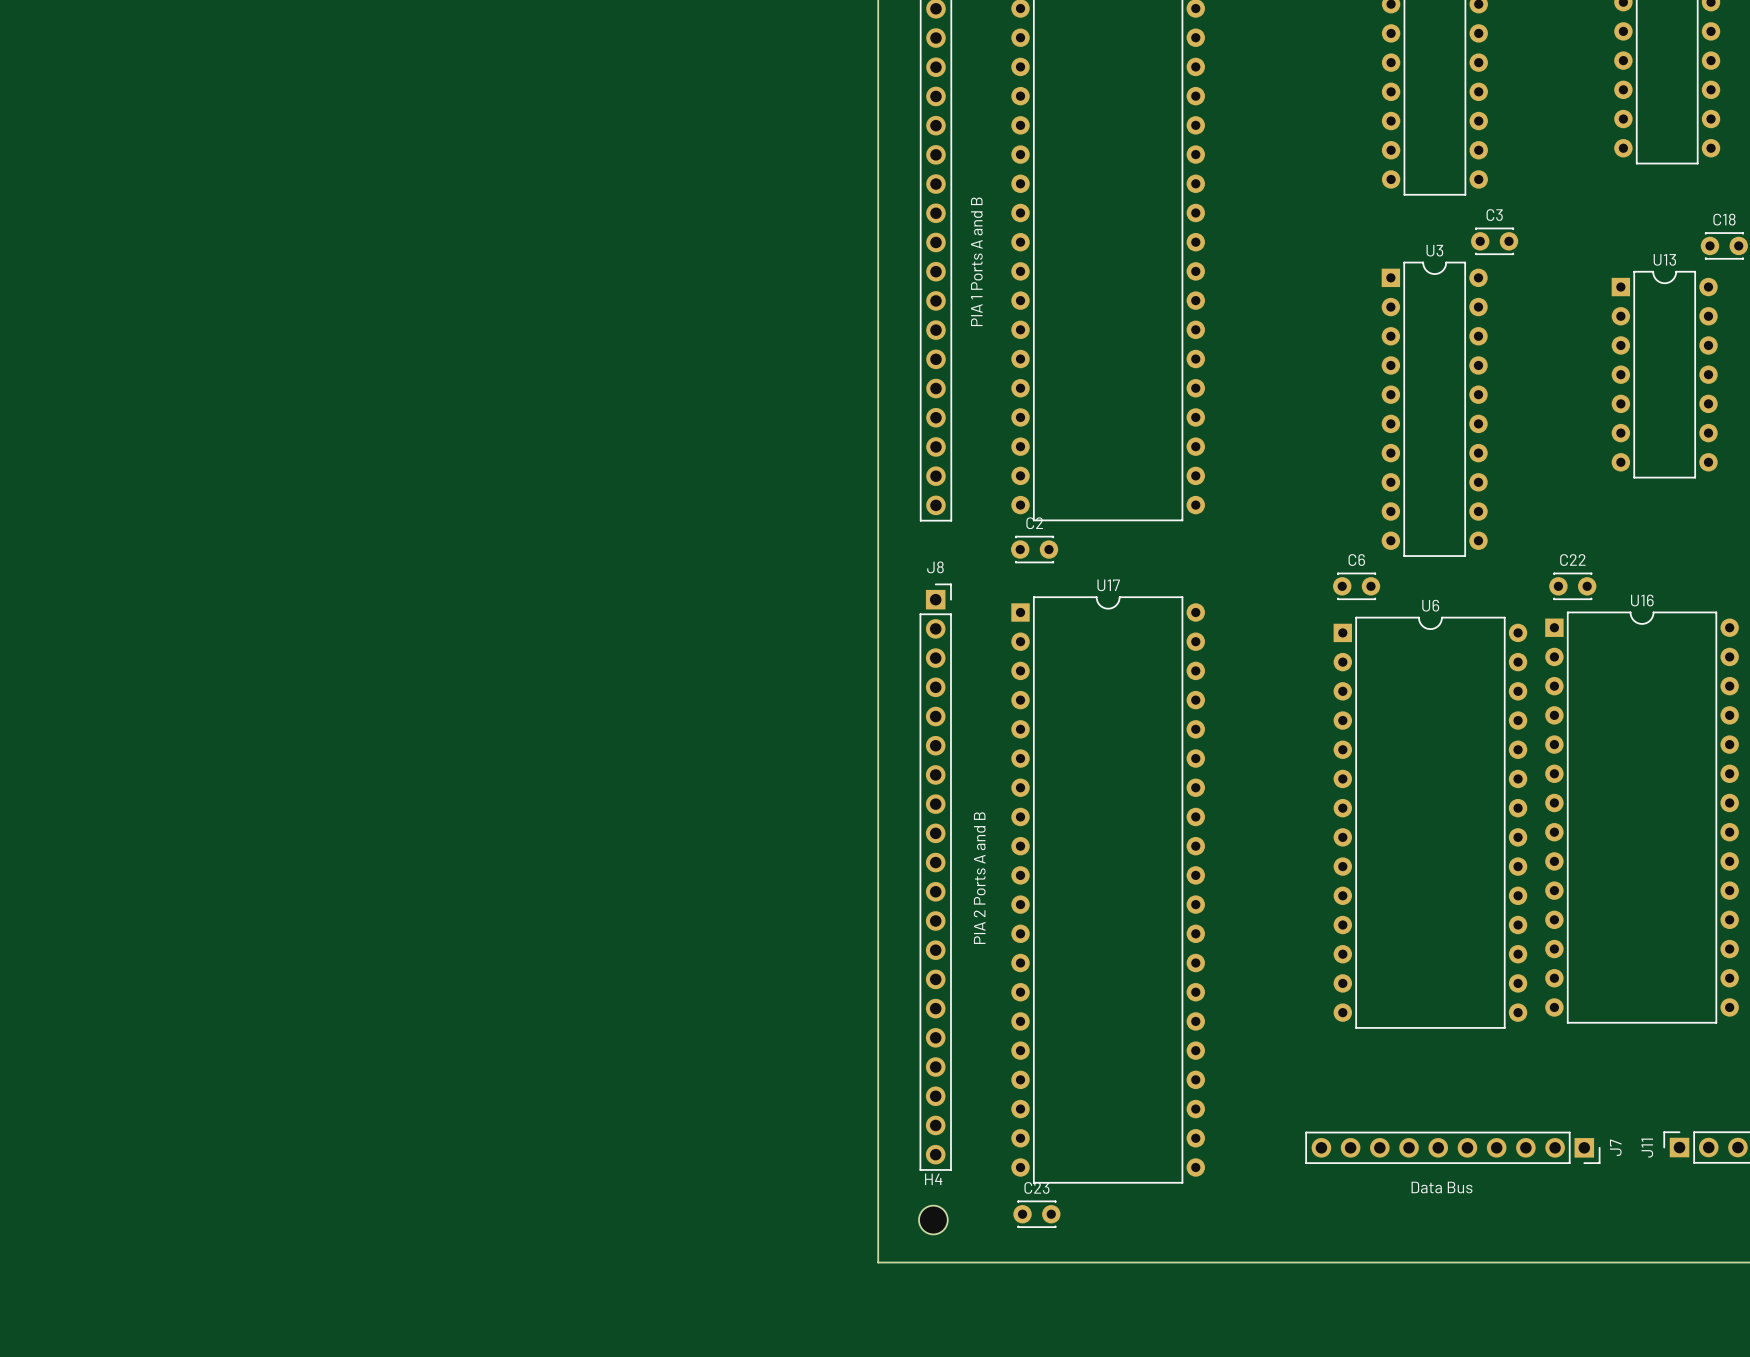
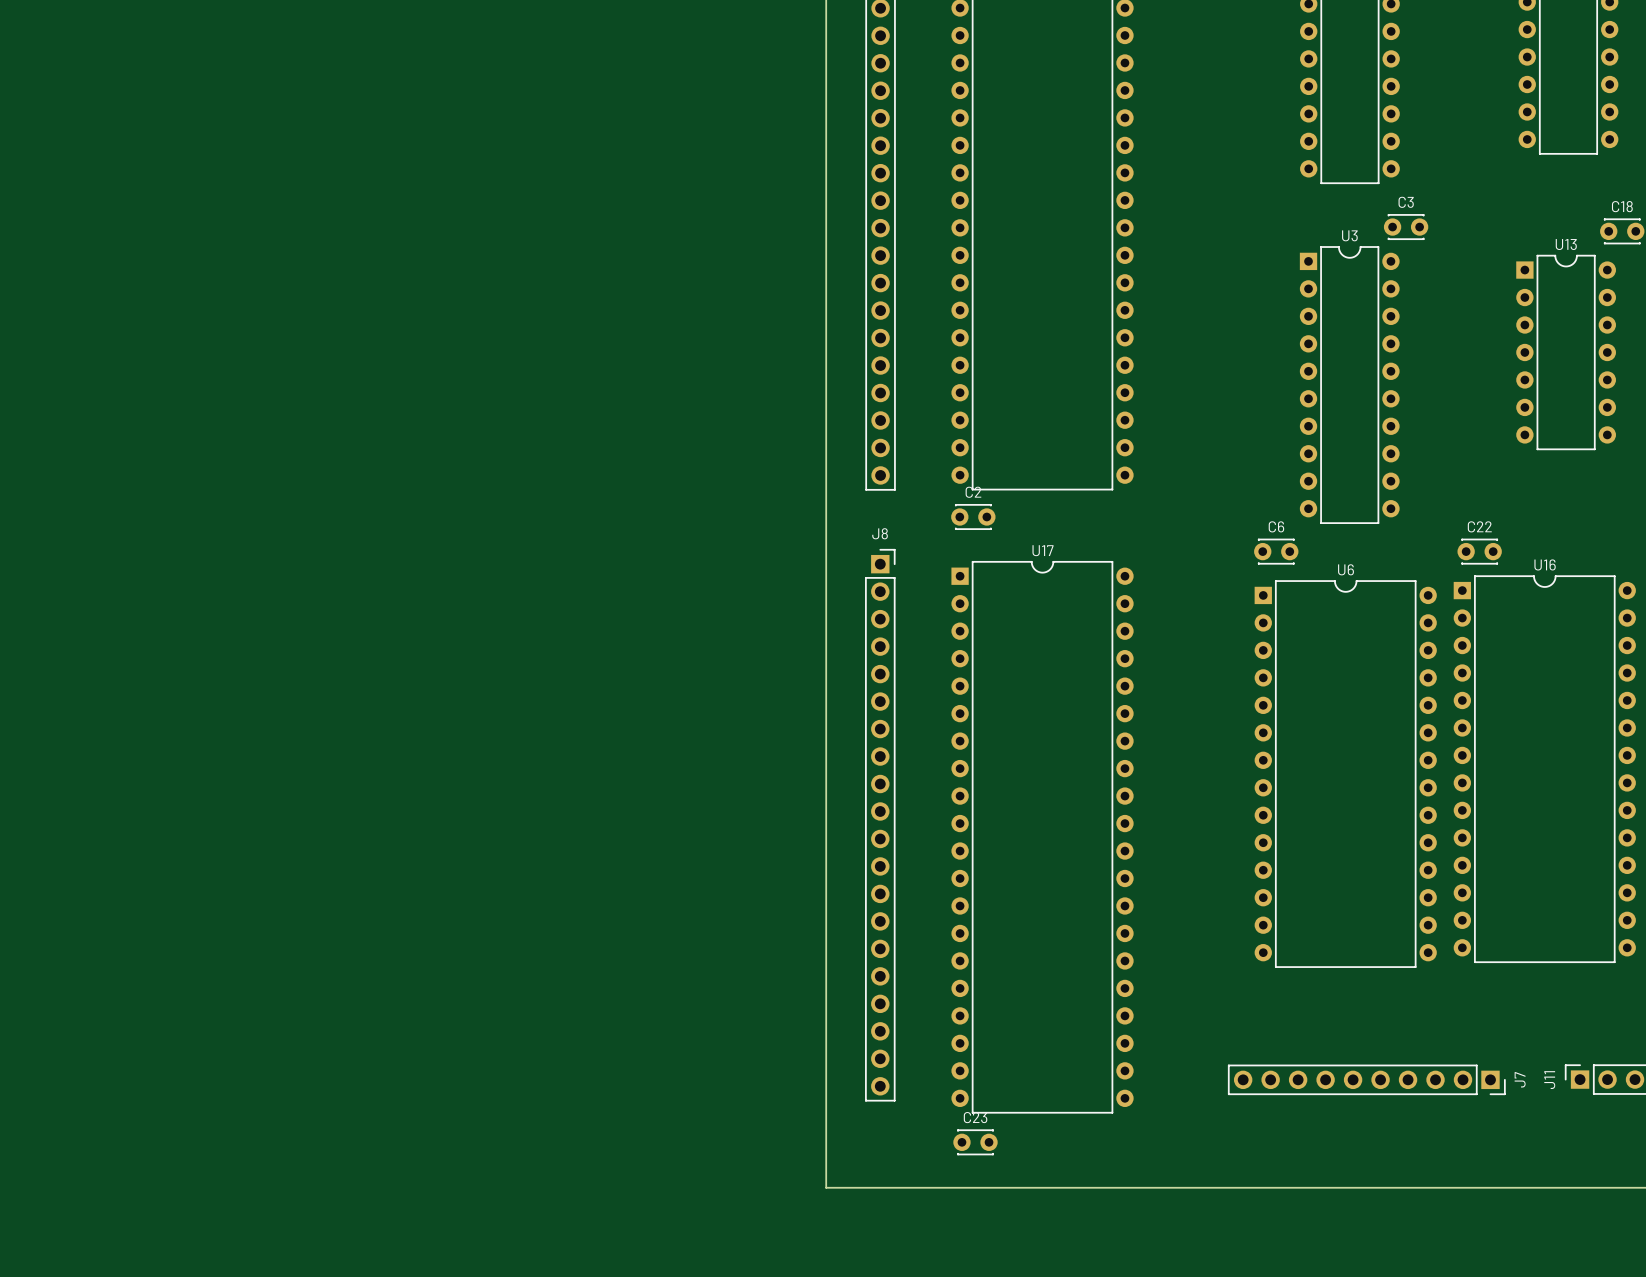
part value: PIA 1 Ports A and B (976, 261) -> none
J8 value: PIA 2 Ports A and B (979, 878) -> none
J7 value: Data Bus (1442, 1187) -> none
H4: (933, 1220) -> none

